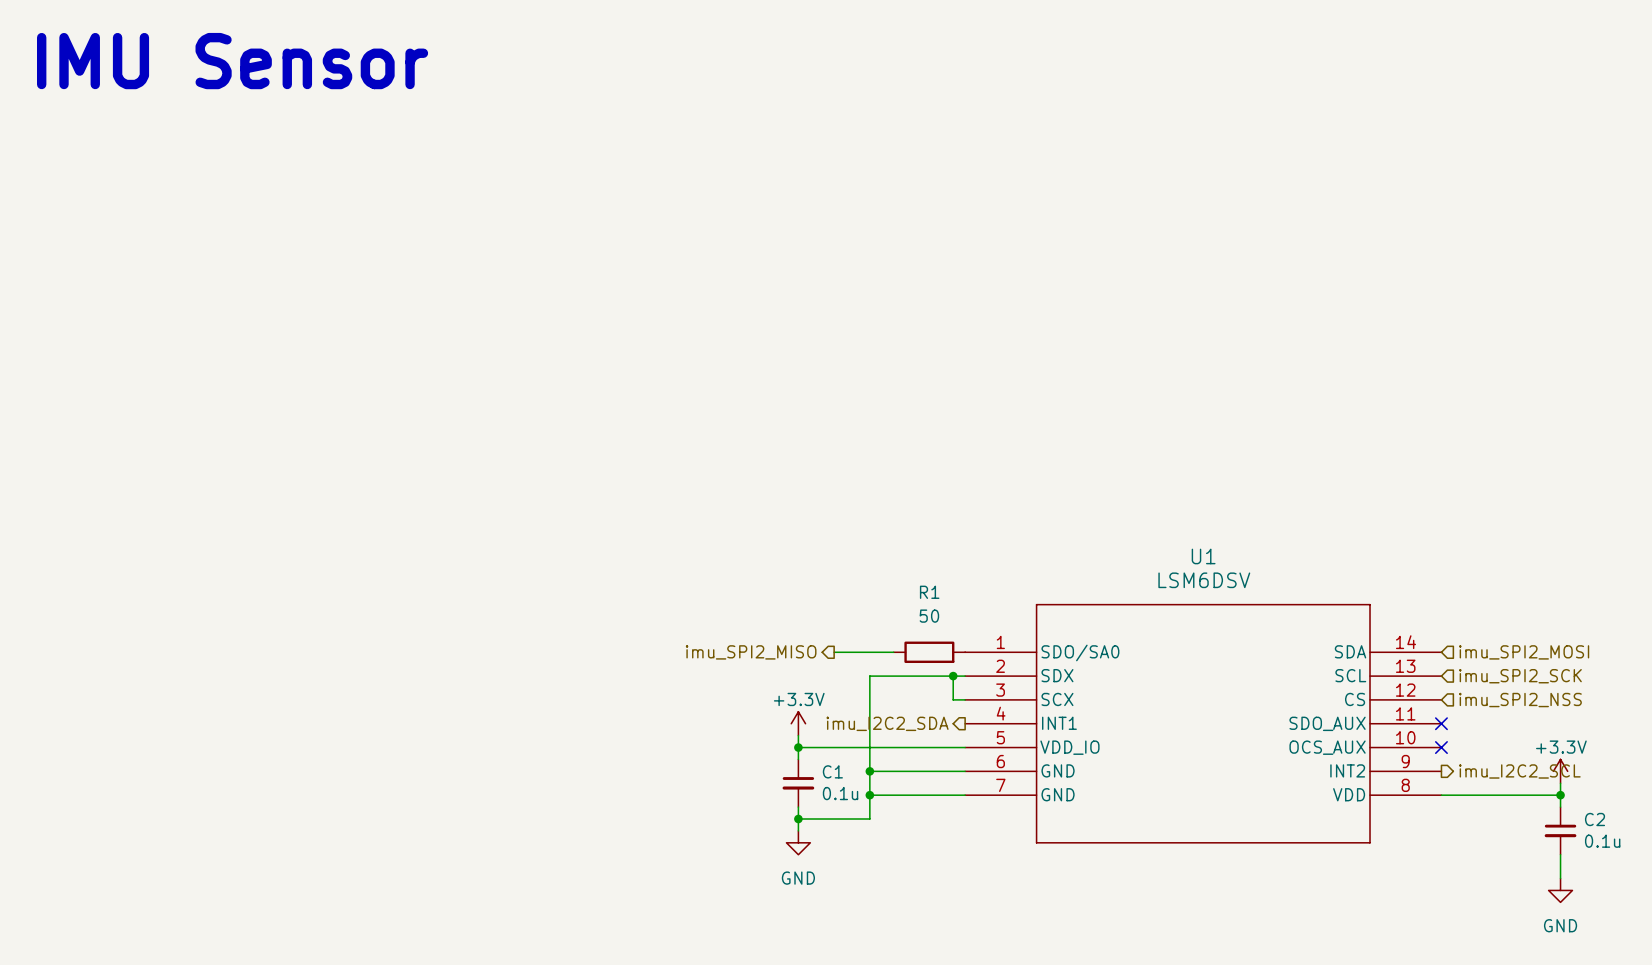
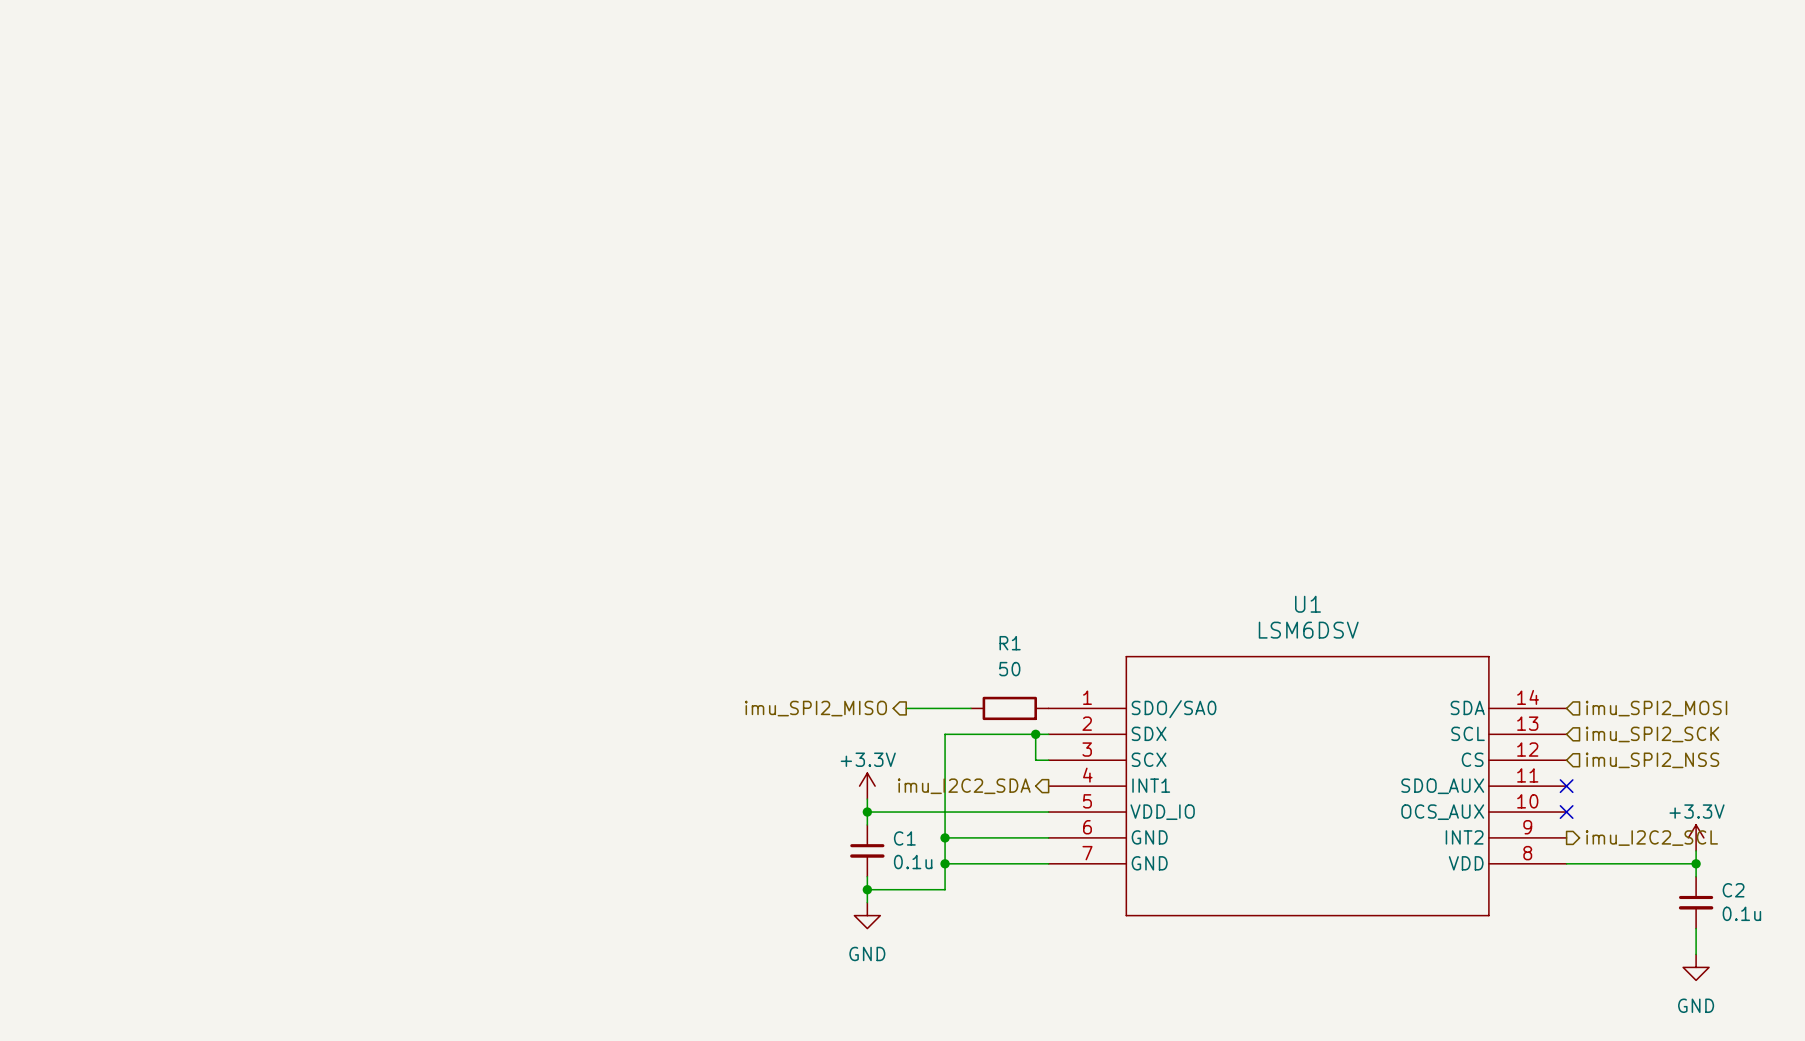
text: IMU Sensor (232, 61) -> none

